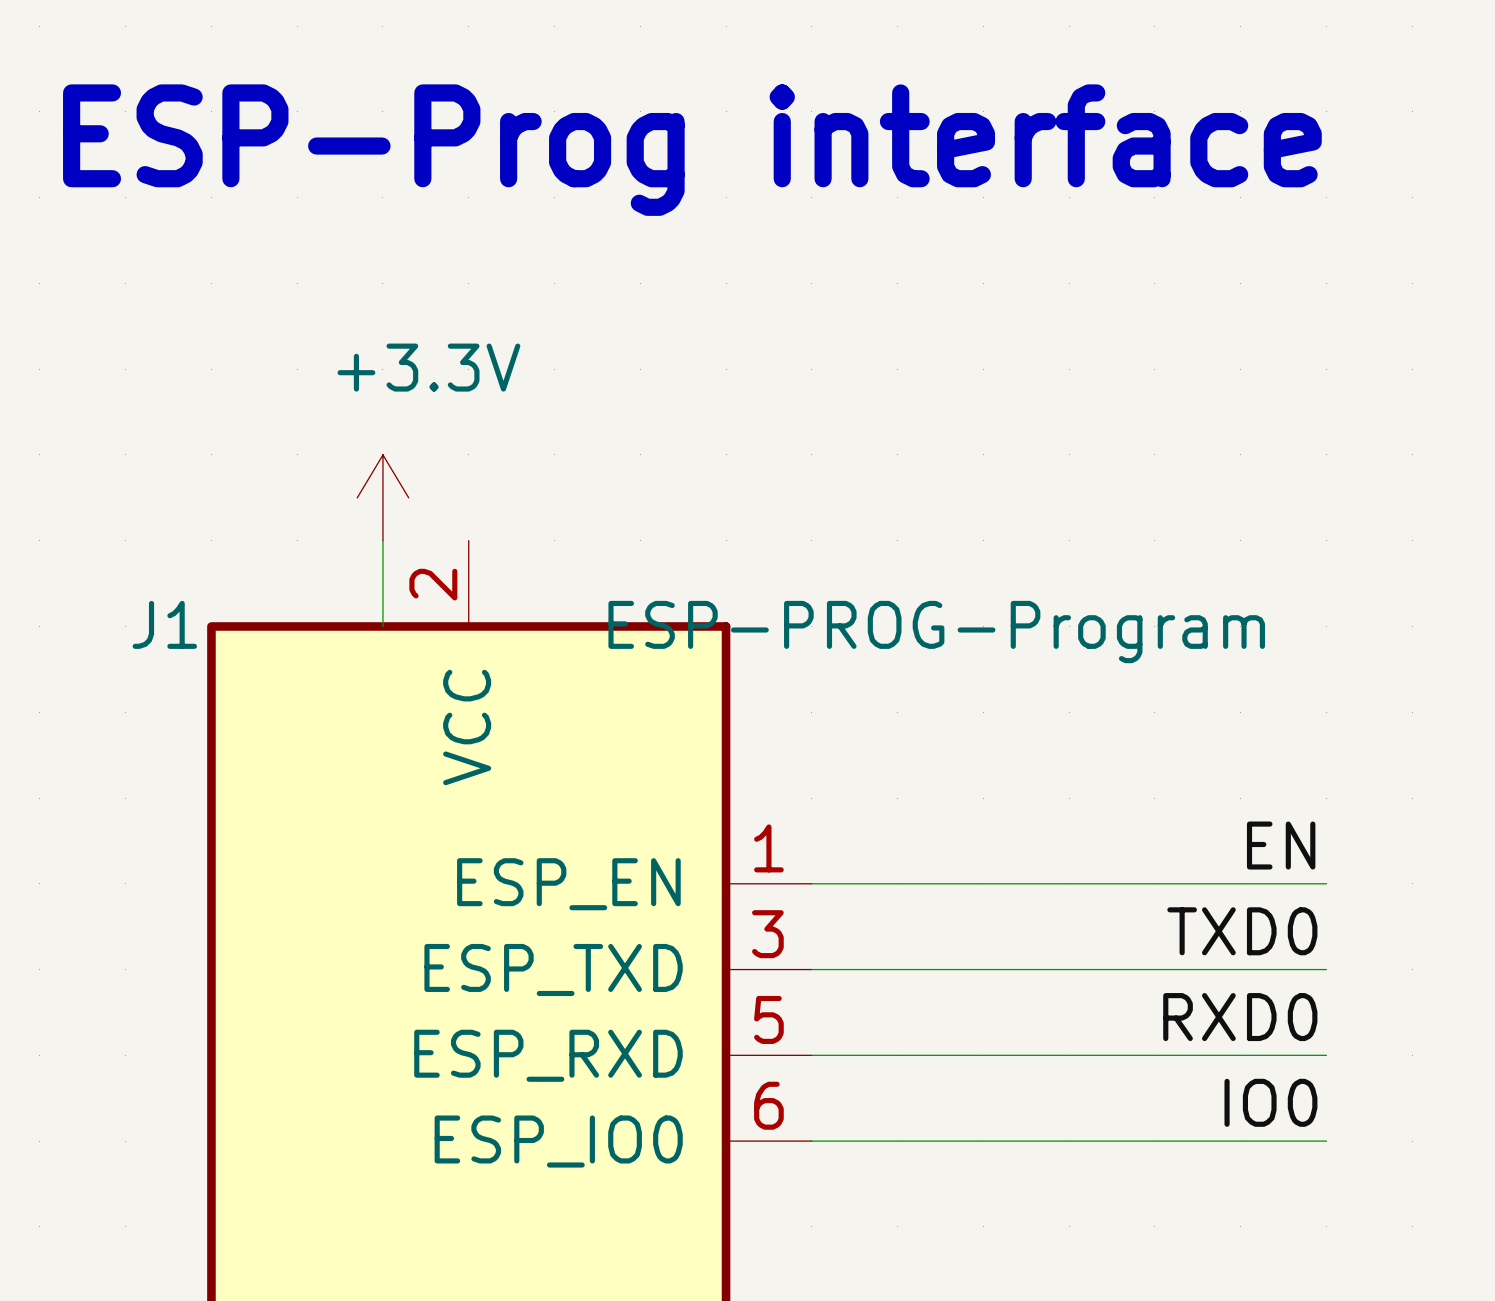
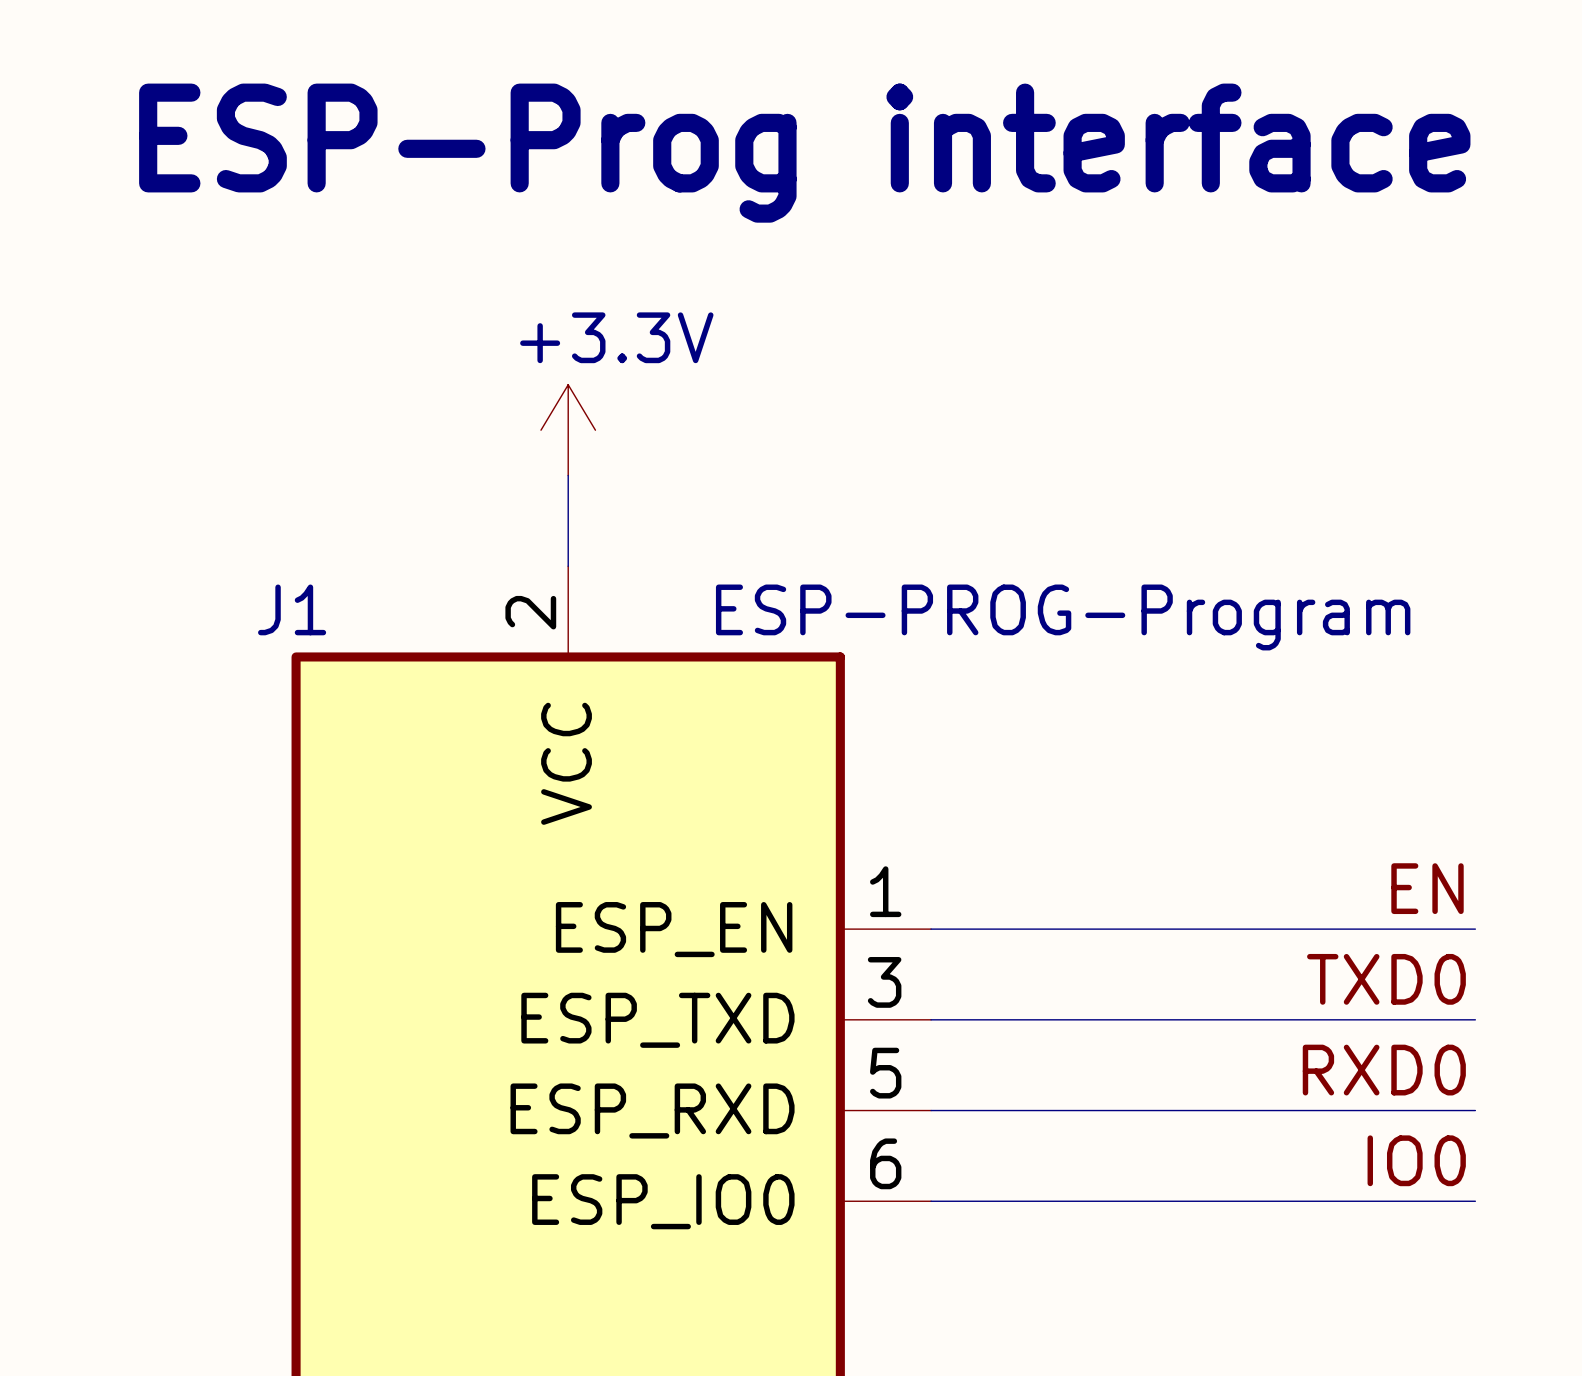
power symbol text position: +3.3V (428, 367) -> +3.3V (616, 337)
power symbol position: +3.3V (382, 497) -> +3.3V (568, 430)
wire: (382, 540) (382, 626) -> (568, 475) (568, 566)
J1 name position: J1 (164, 624) -> J1 (292, 609)
J1 value position: ESP-PROG-Program (936, 632) -> ESP-PROG-Program (1063, 617)

